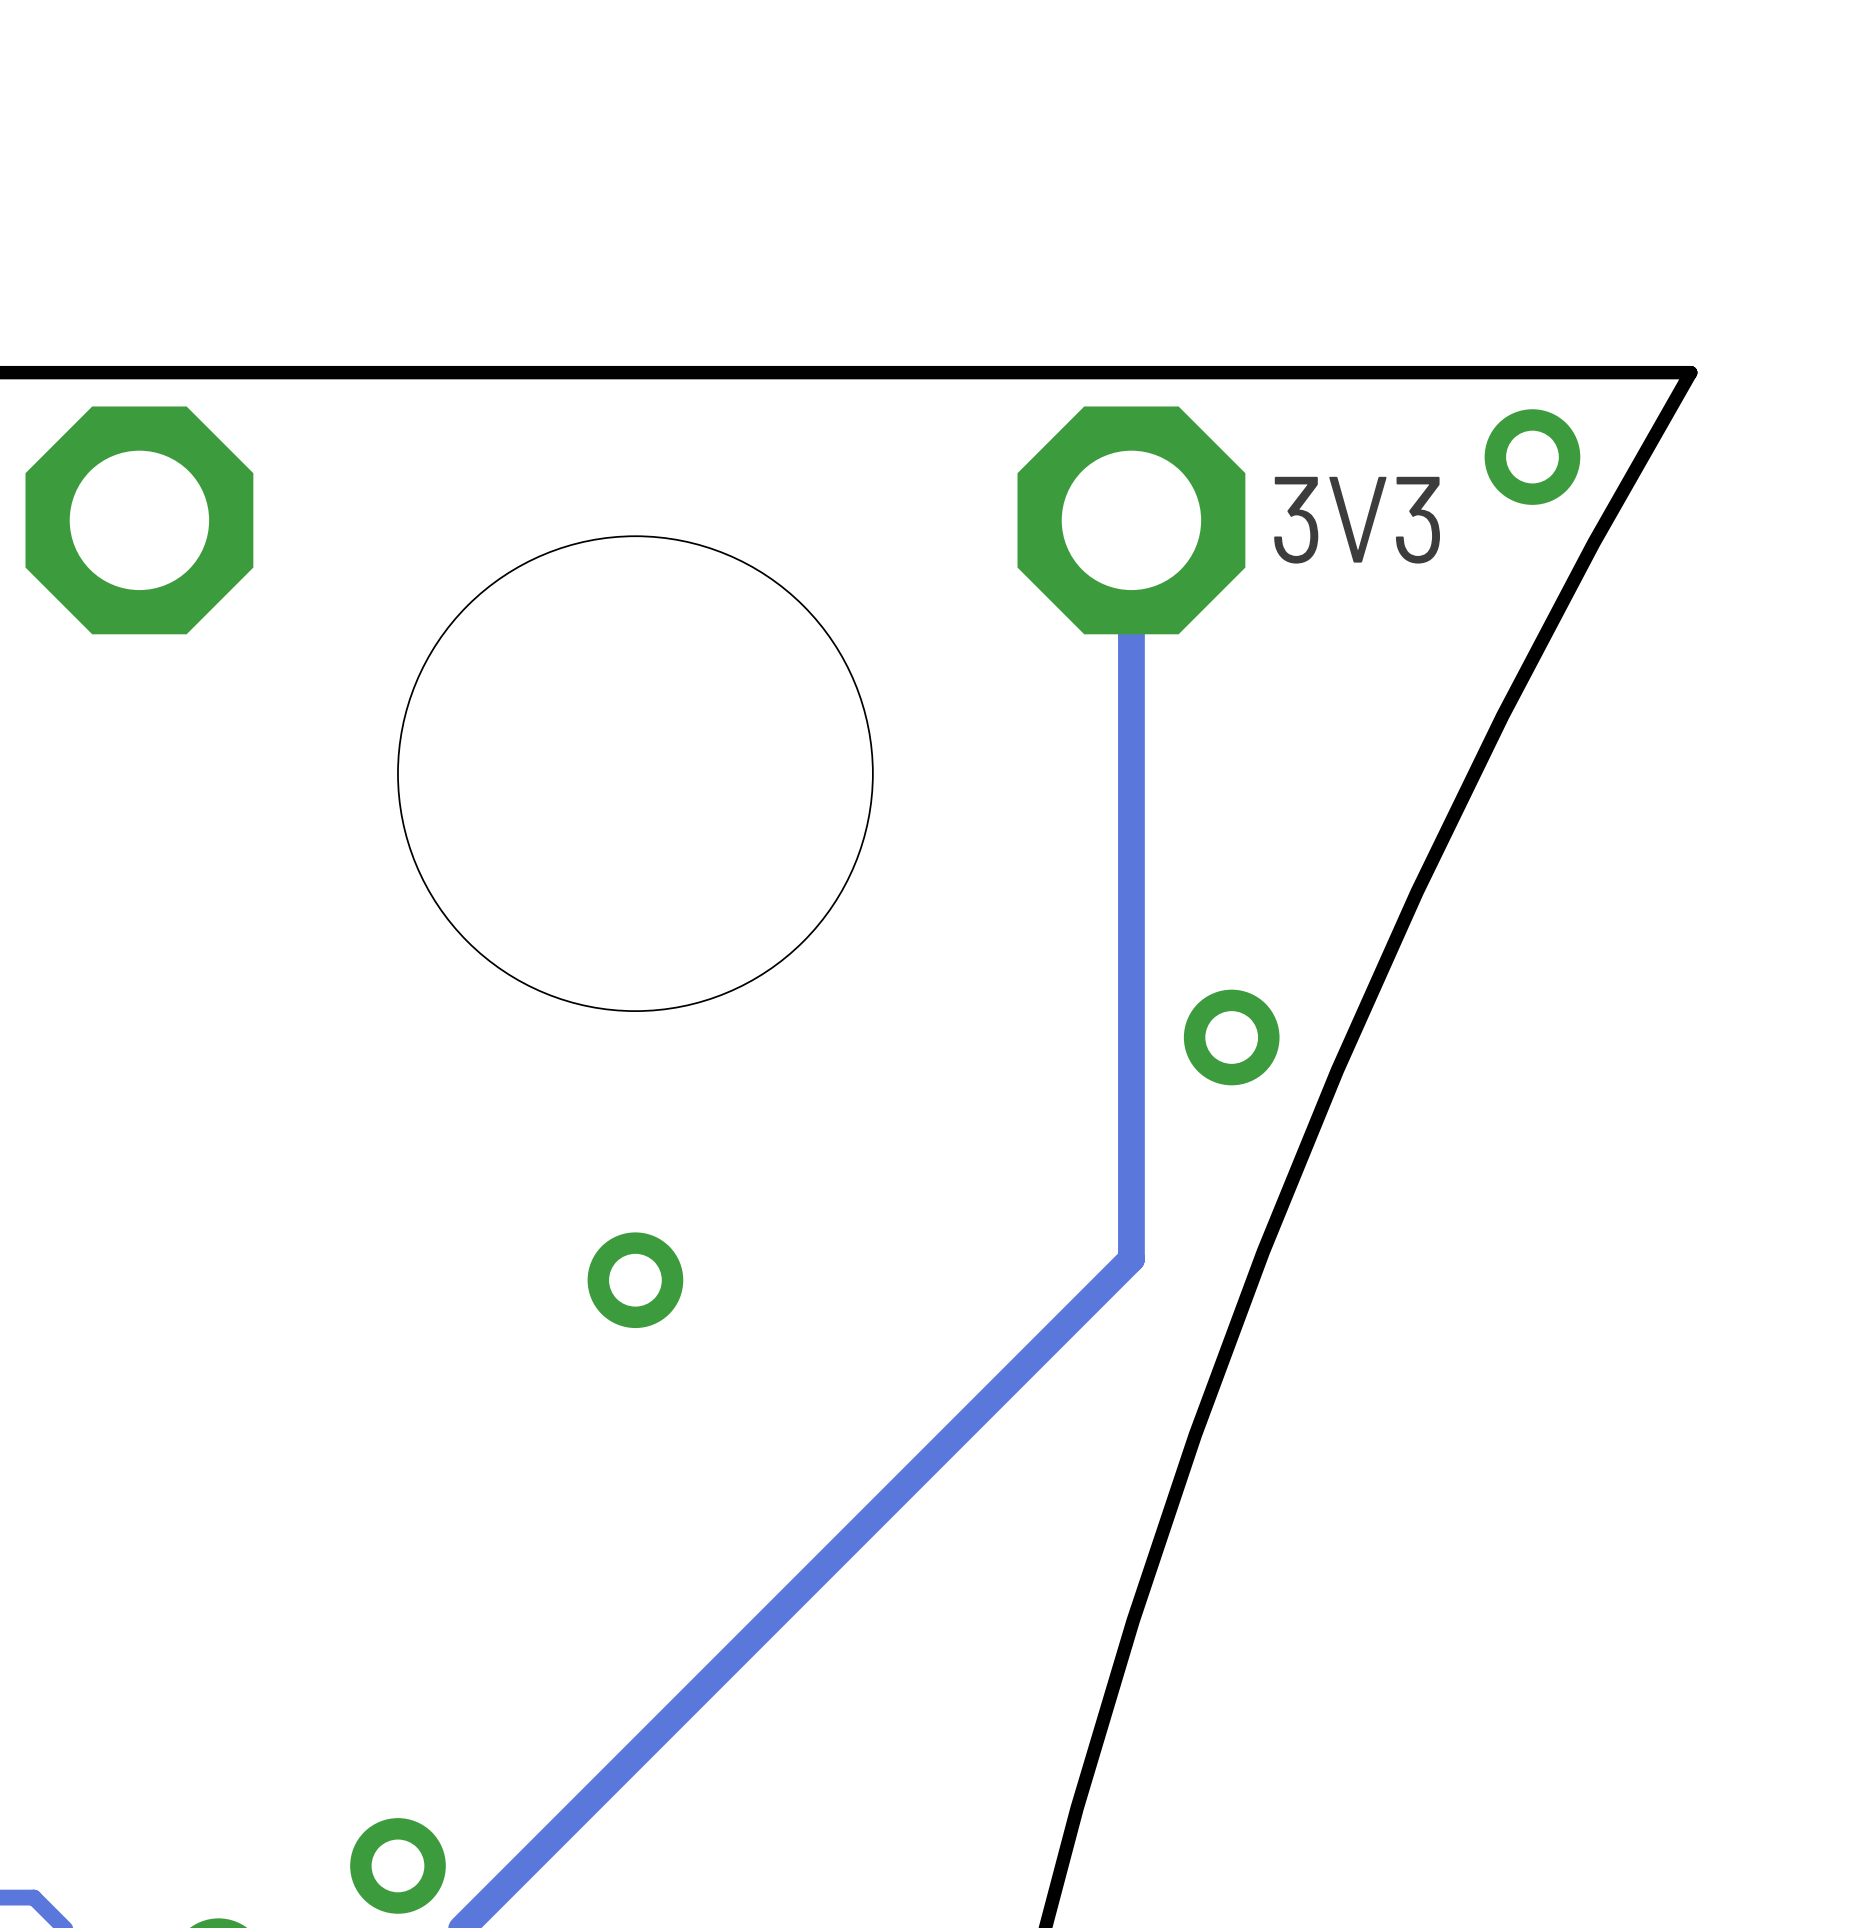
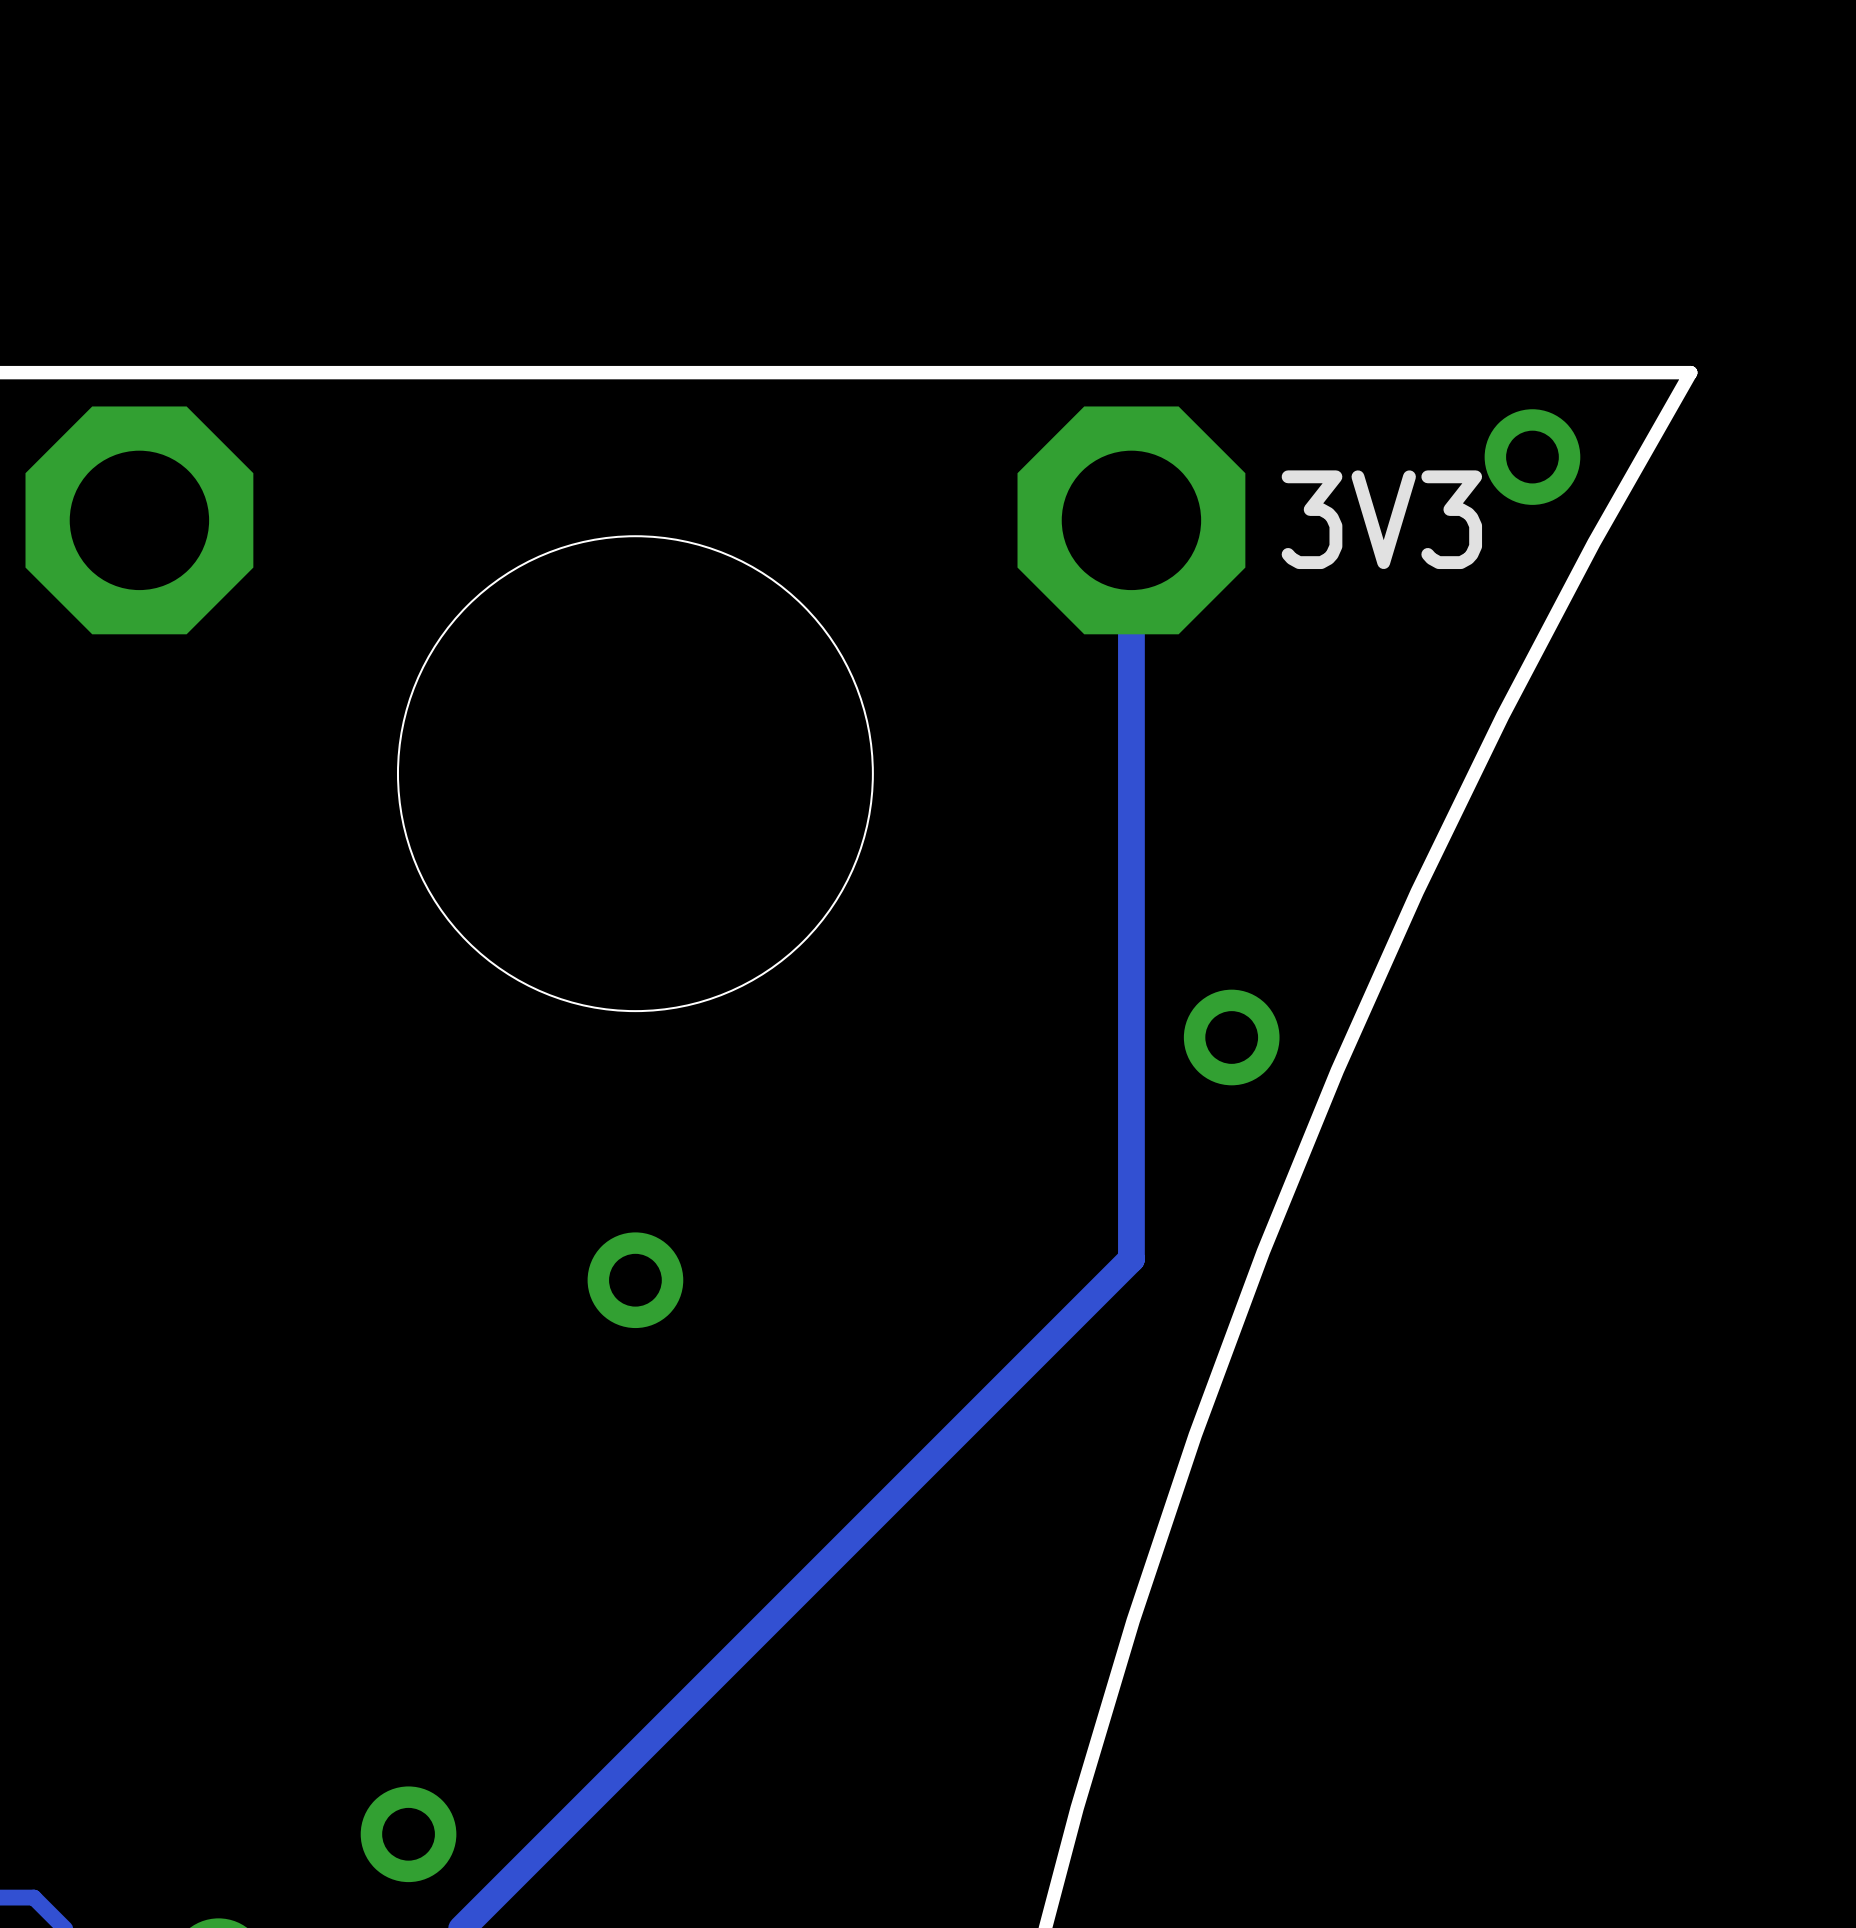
via position: (397, 1865) -> (408, 1834)

